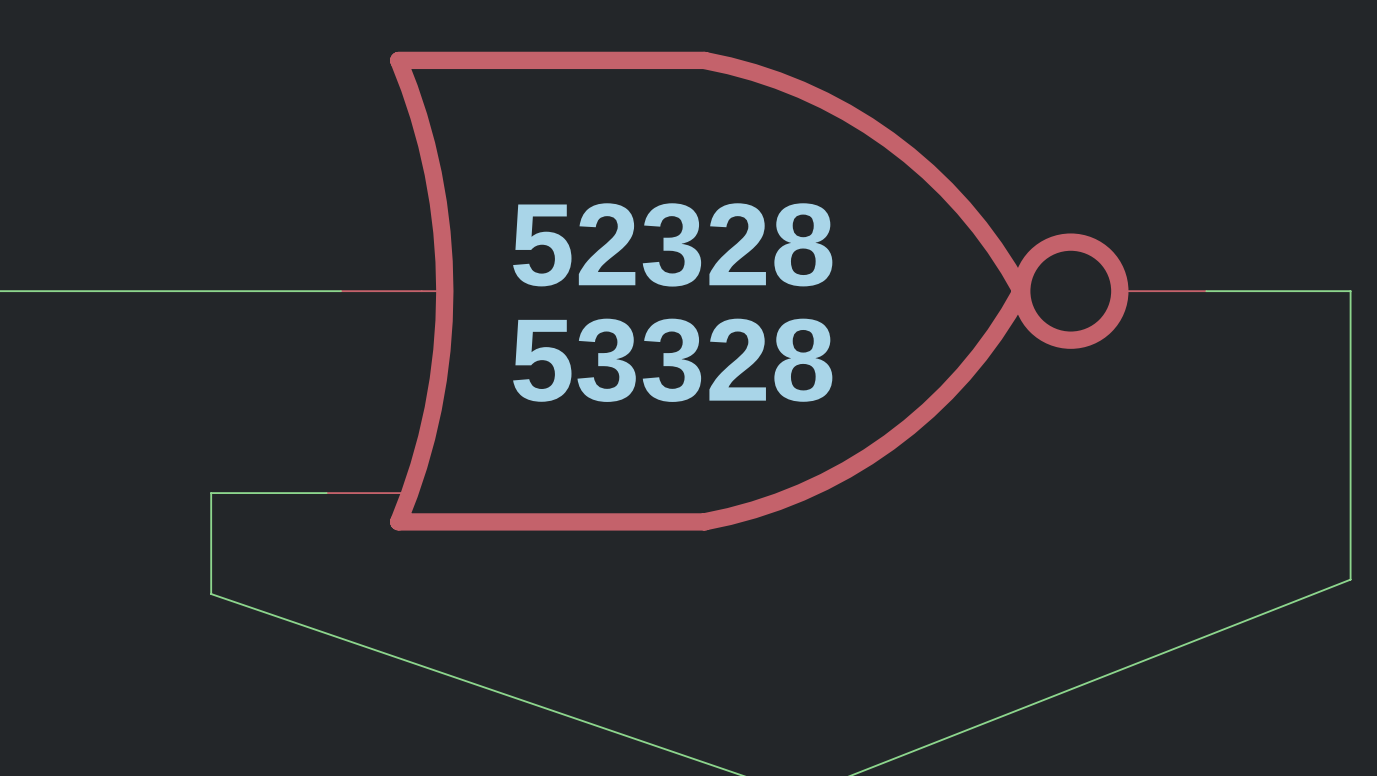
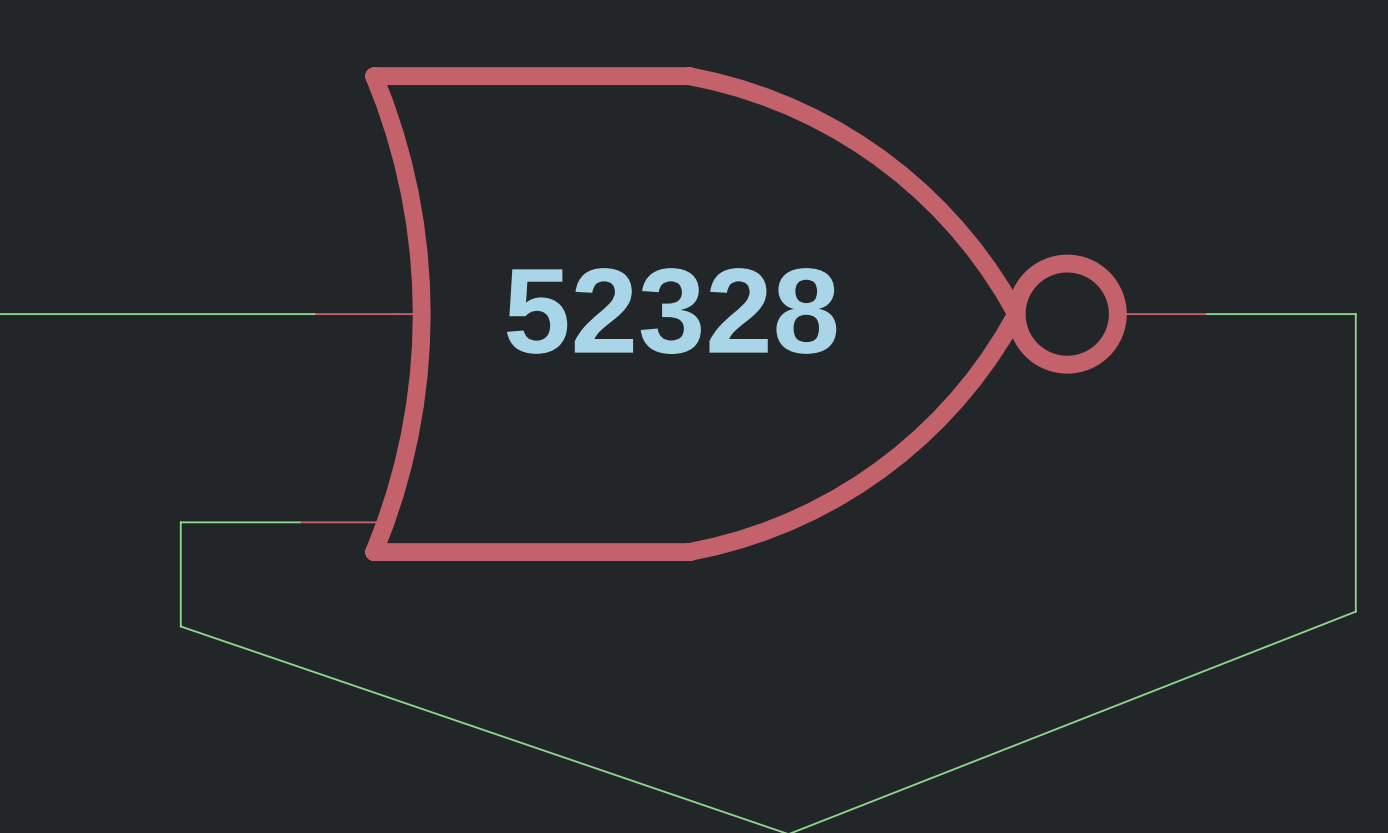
part text position: 52328 (672, 244) -> 52328 (671, 311)
part text: 53328 (672, 360) -> none

